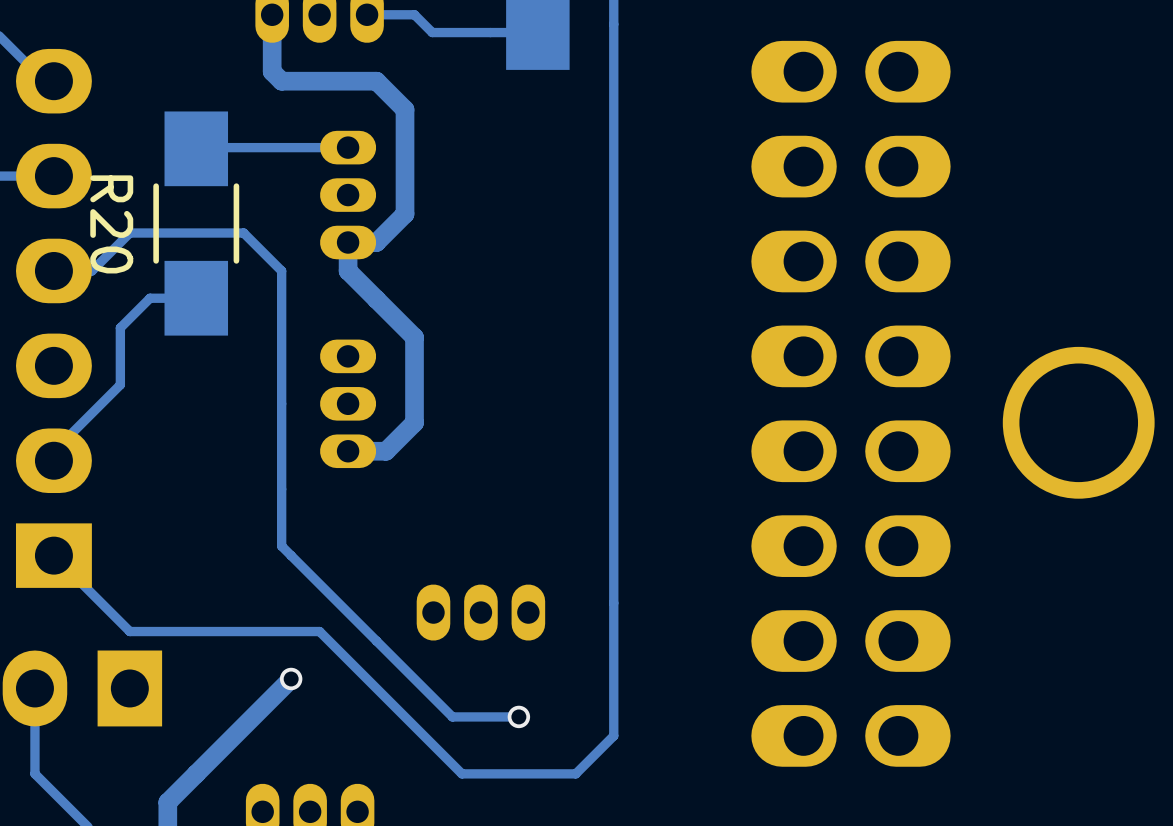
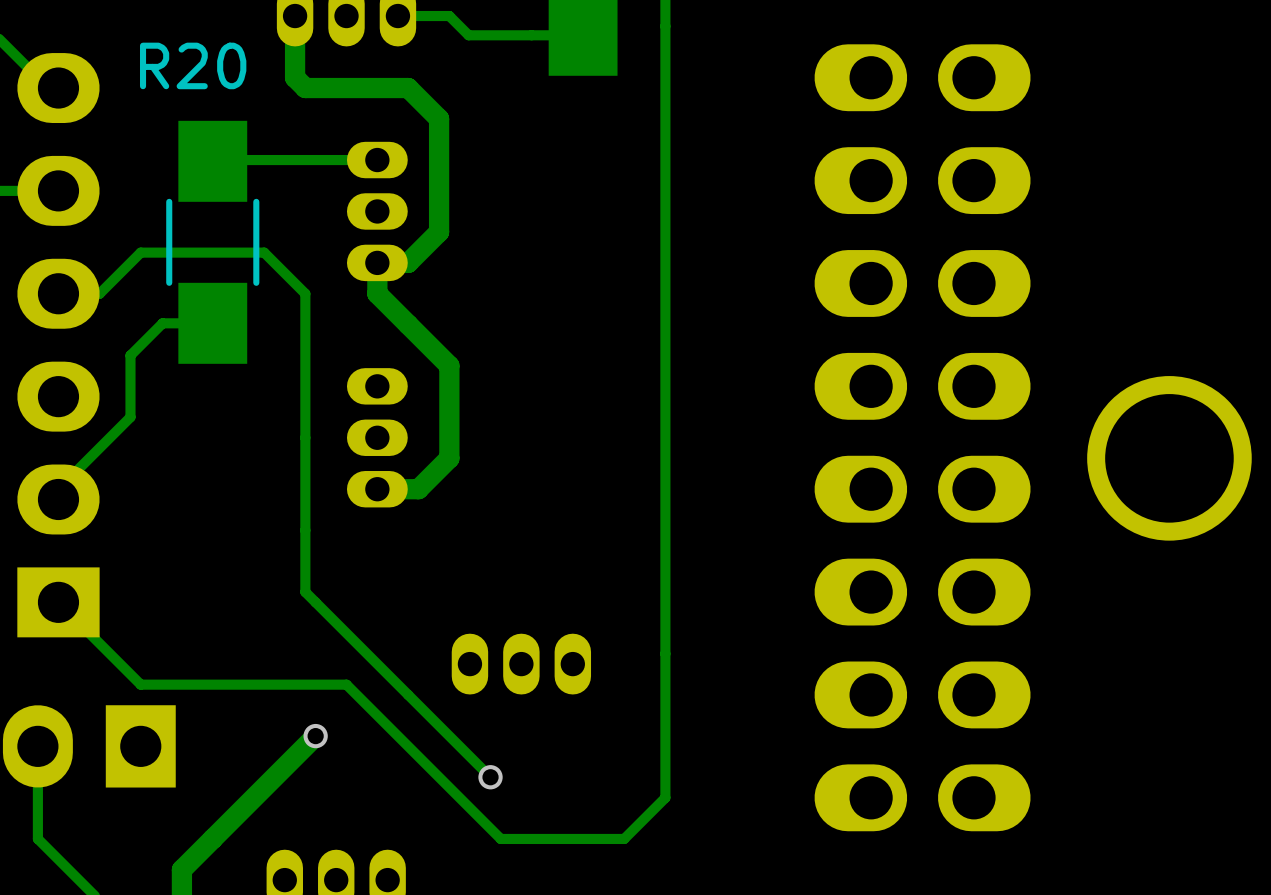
R20 name rotation: 0° (111, 224) -> 90° counterclockwise (193, 65)
R20 name position: R20 (111, 224) -> R20 (193, 65)
track: (518, 716) (452, 716) -> none
via position: (518, 716) -> (490, 777)

